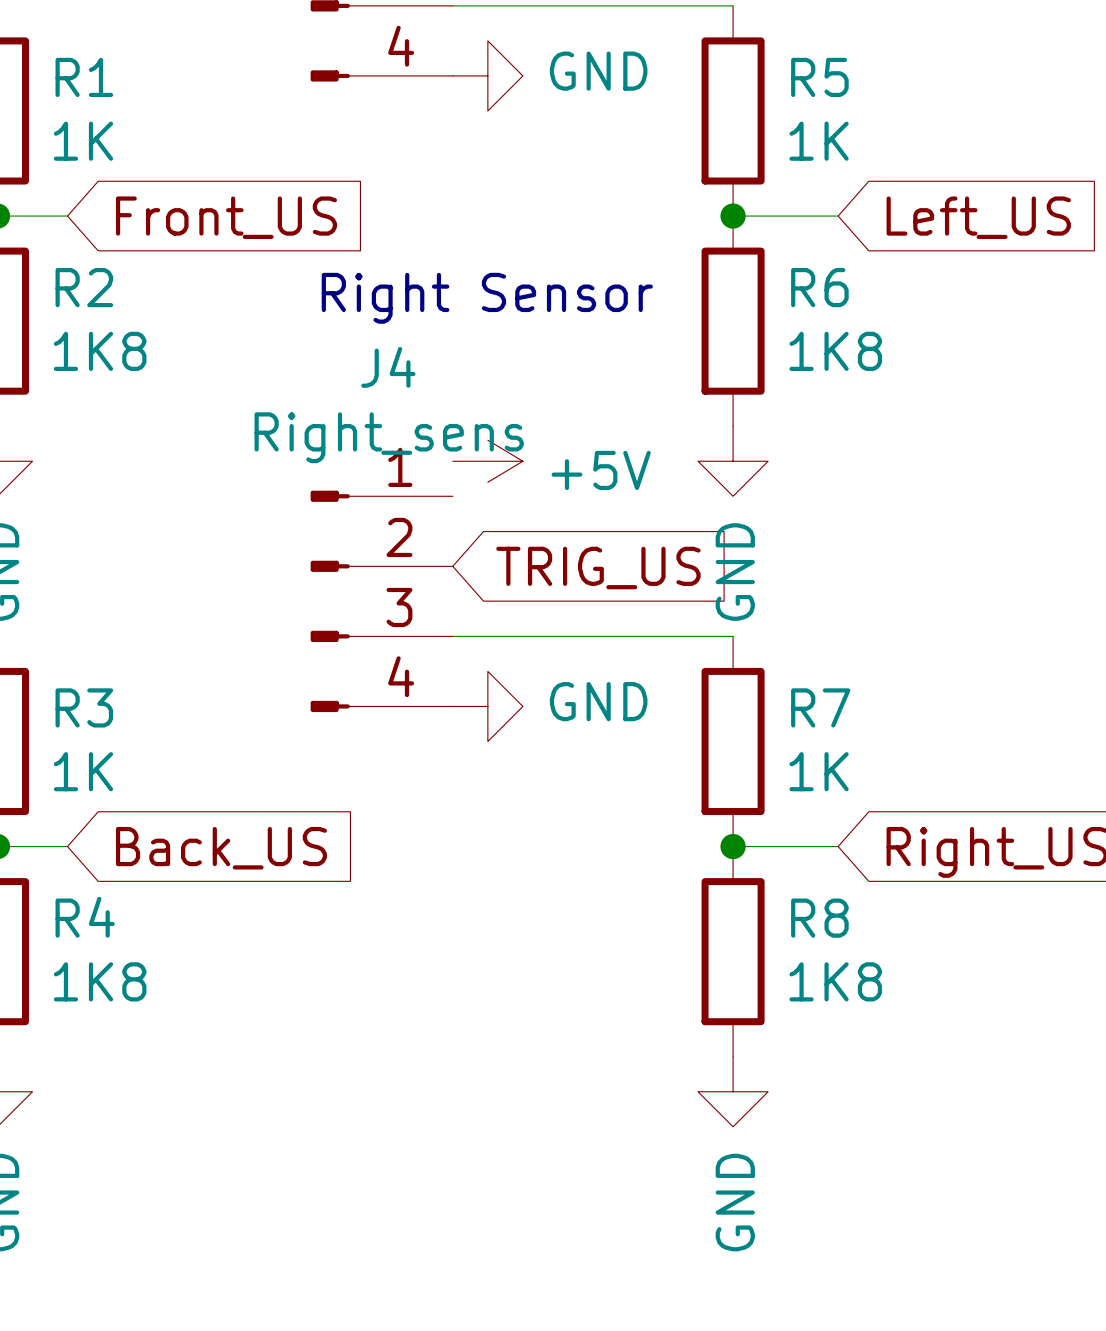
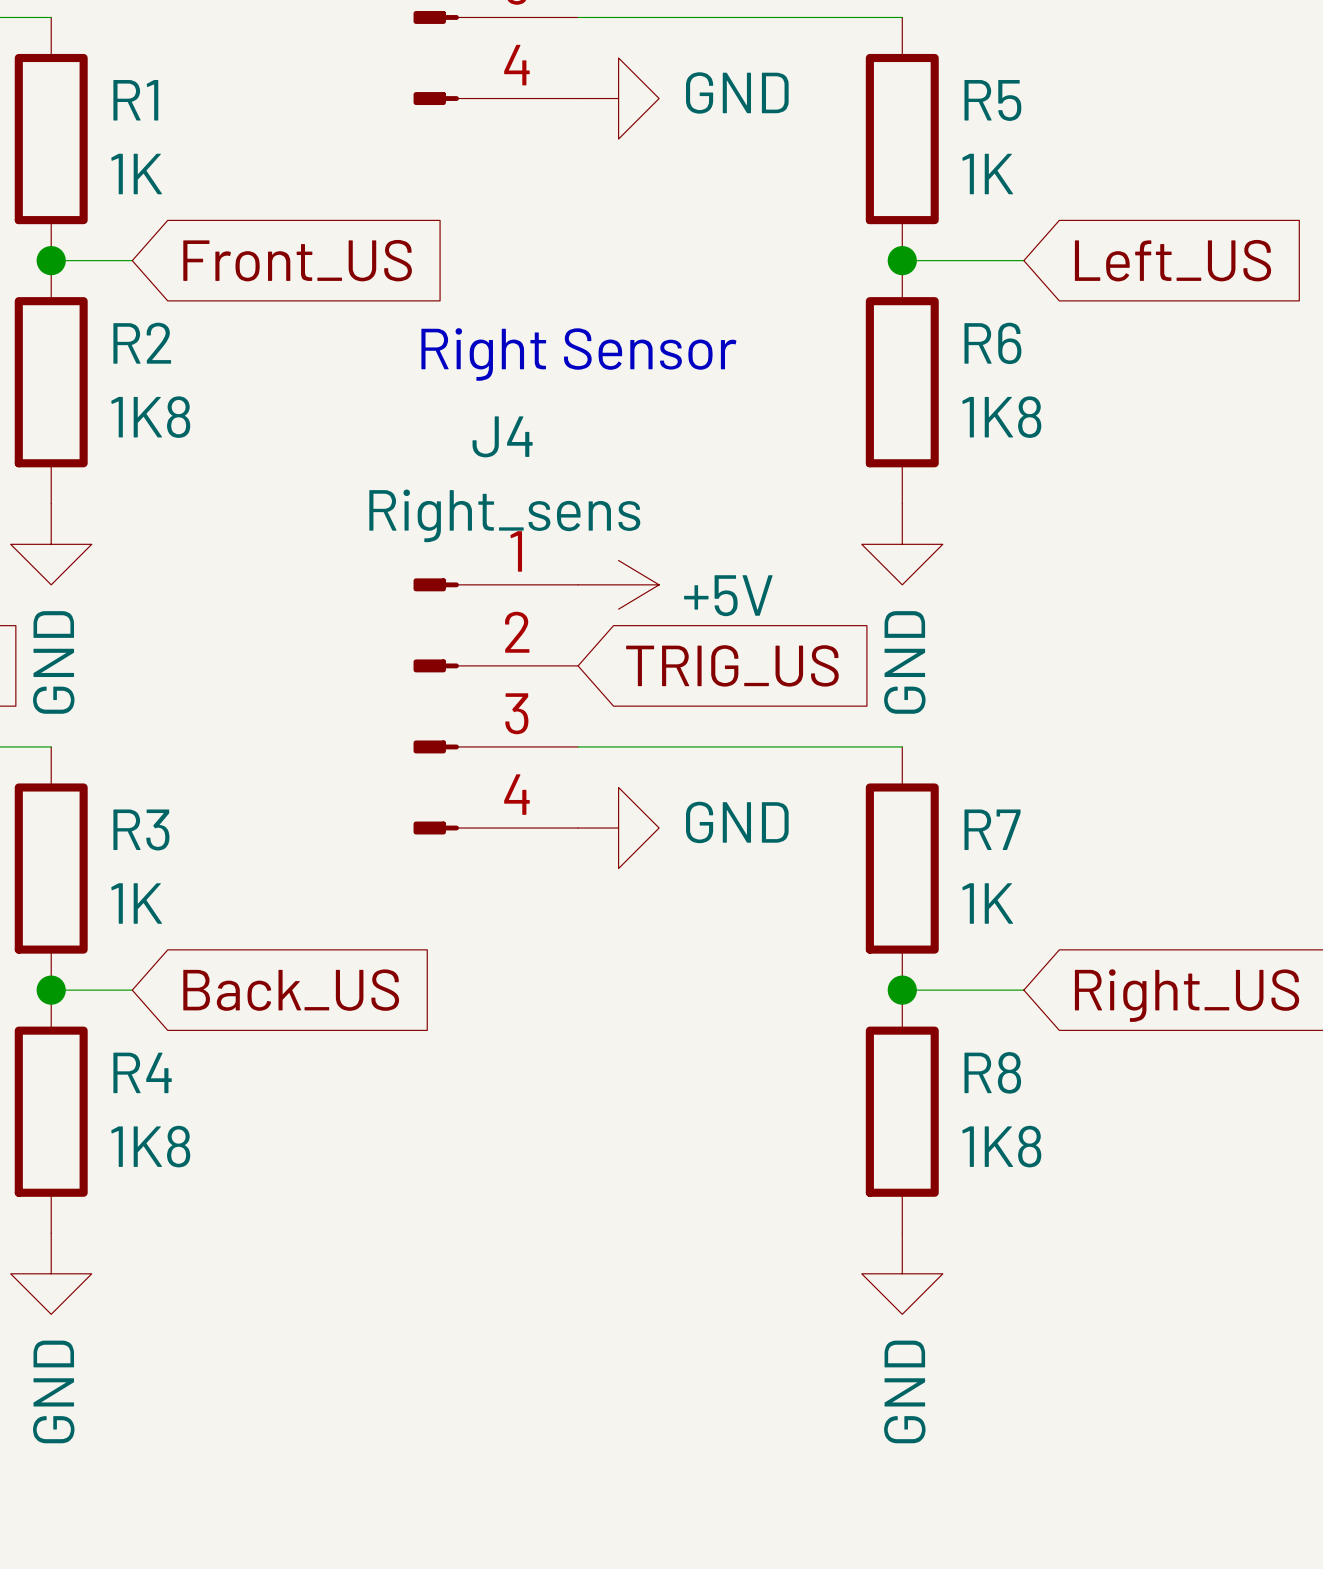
power symbol position: +5V (487, 461) -> +5V (618, 584)

